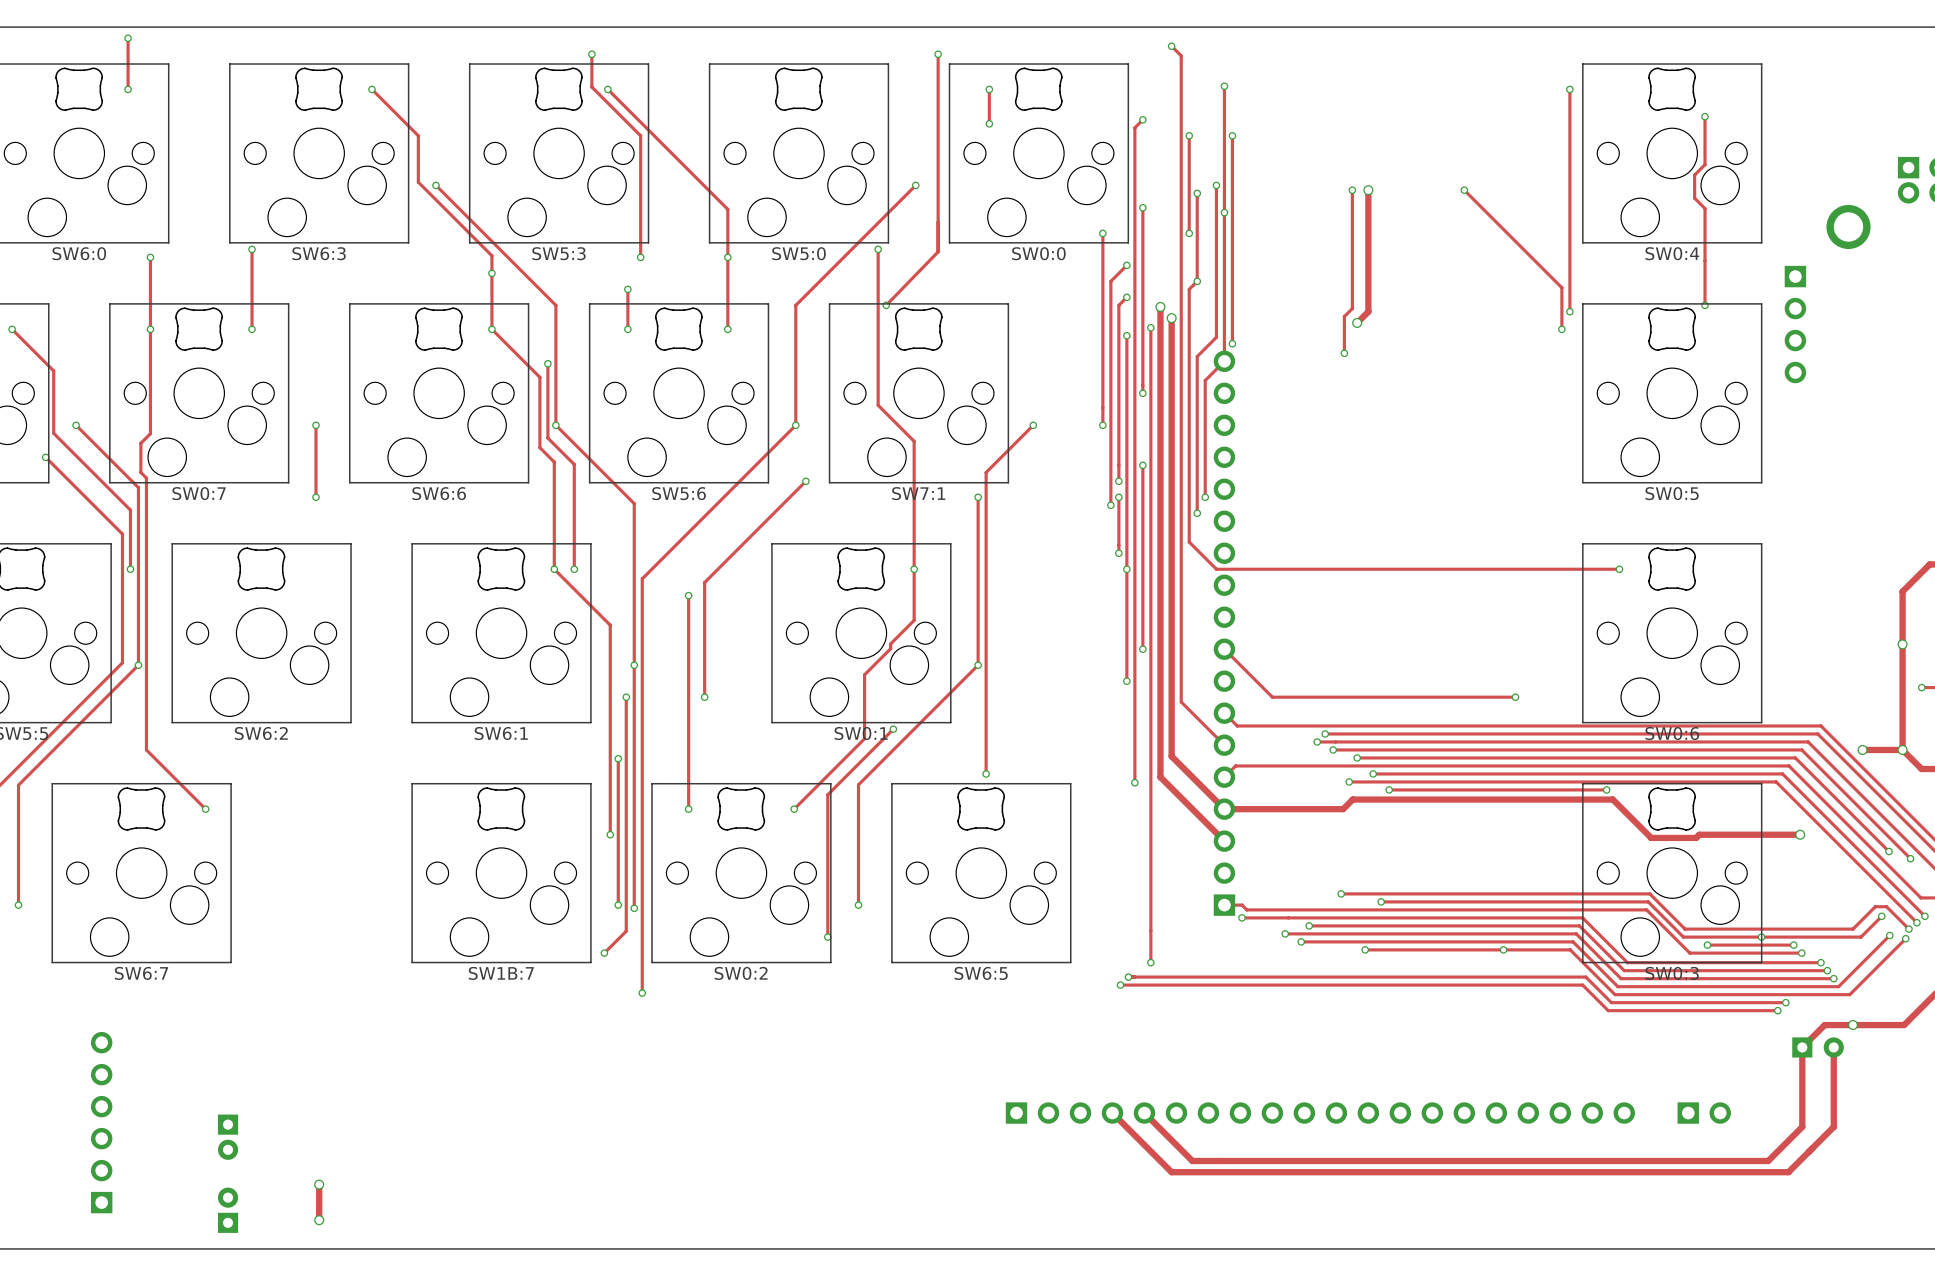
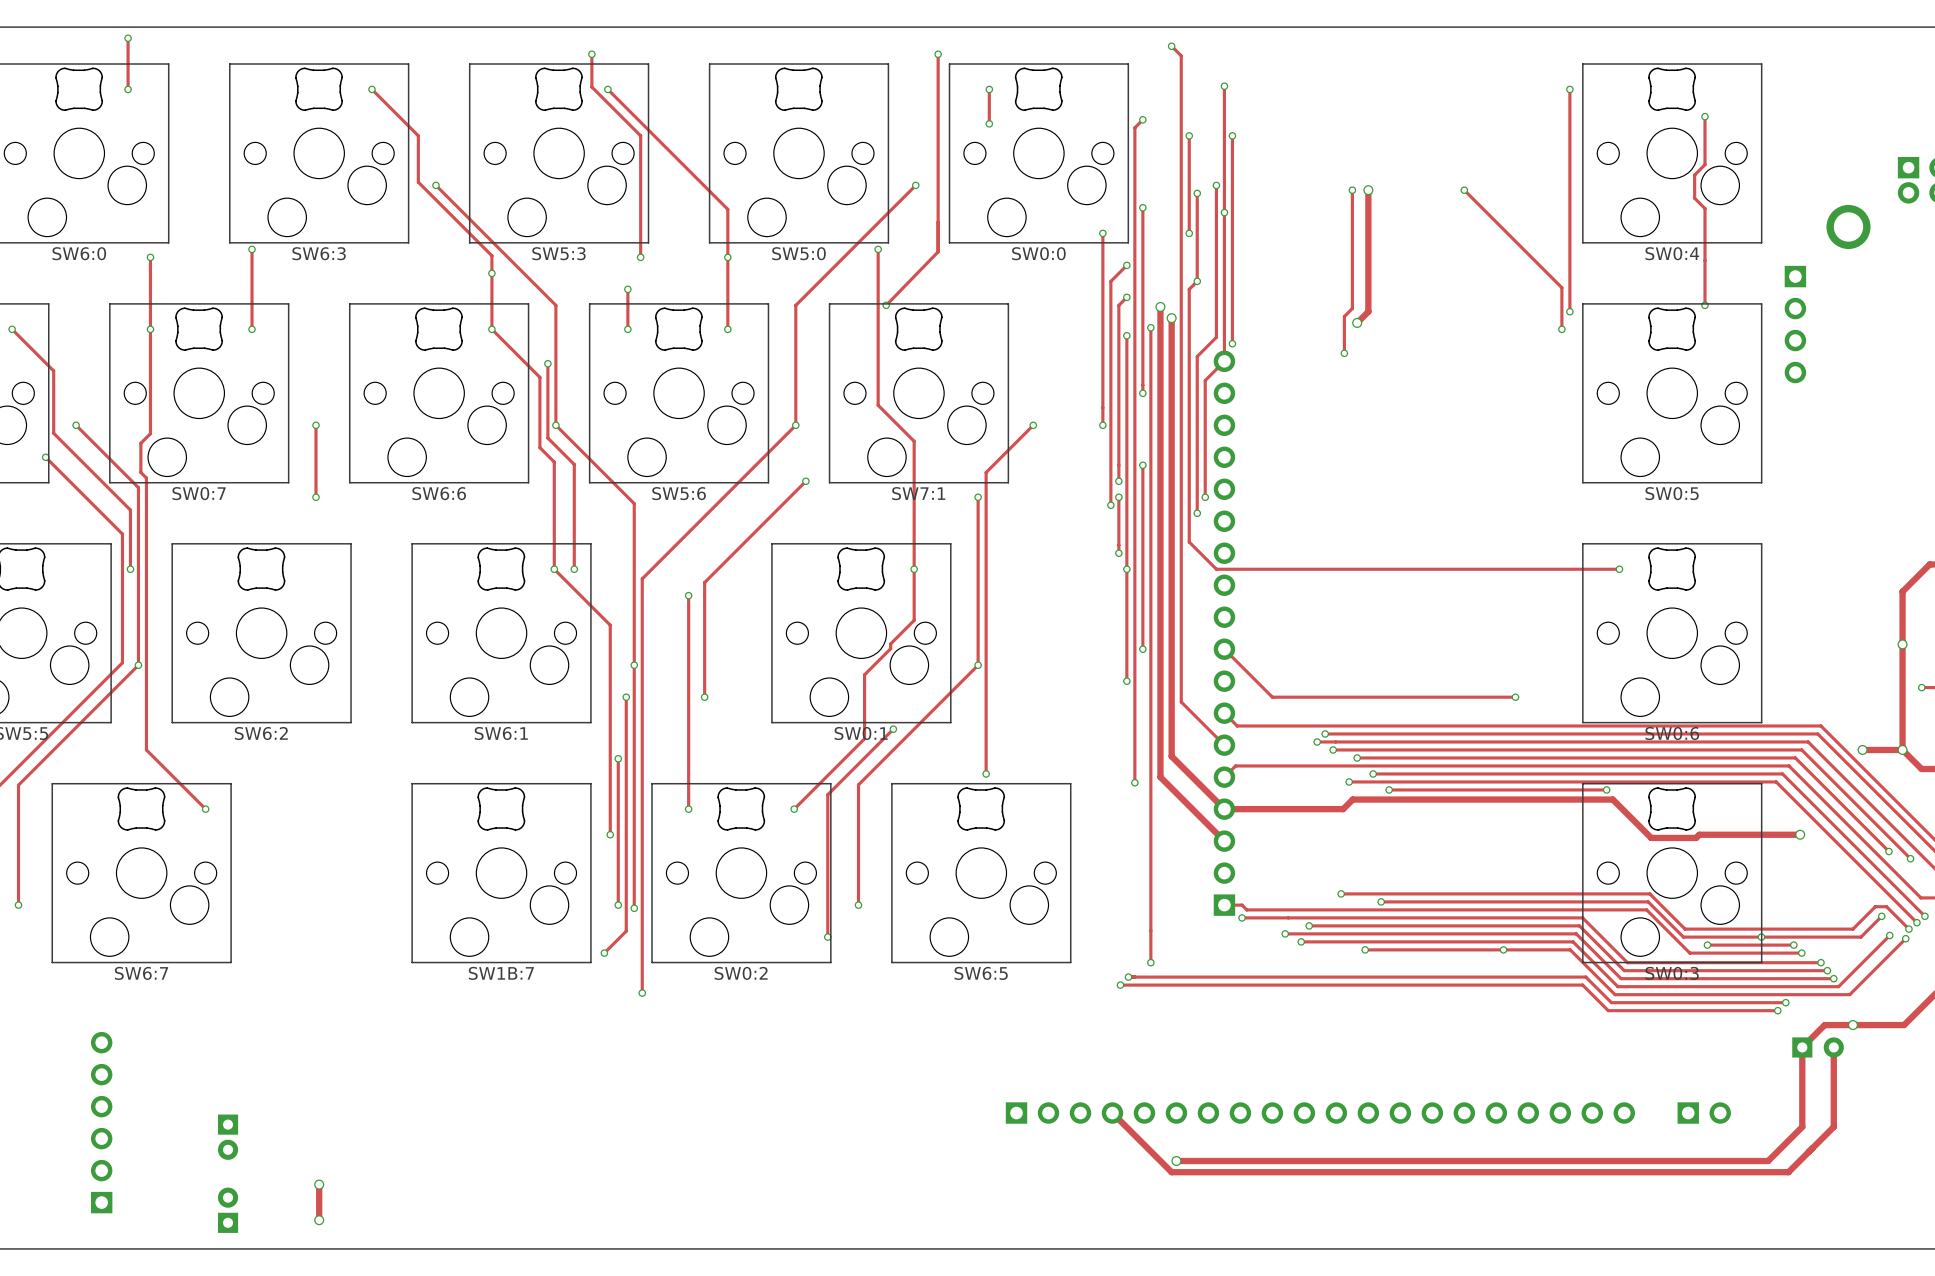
track: (1144, 1113) (1192, 1161) -> (1176, 1161) (1192, 1161)
via: none -> (1176, 1161)

